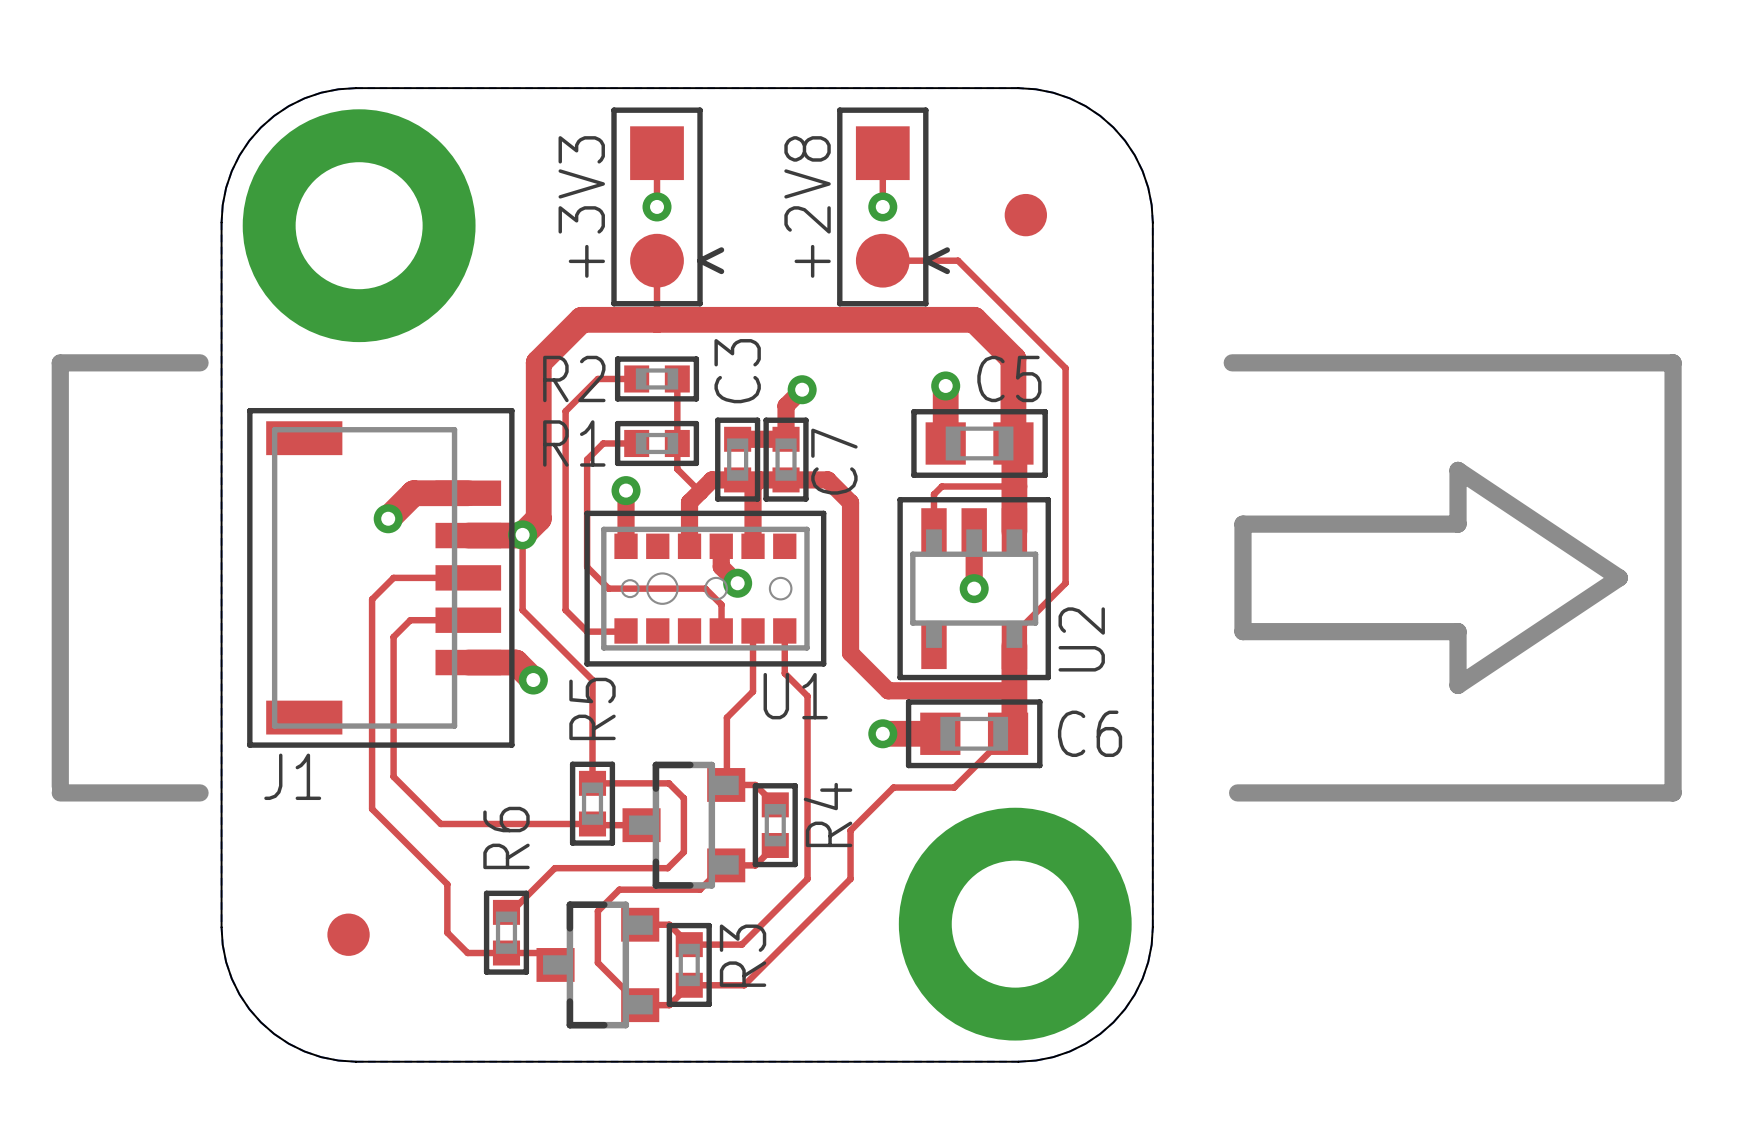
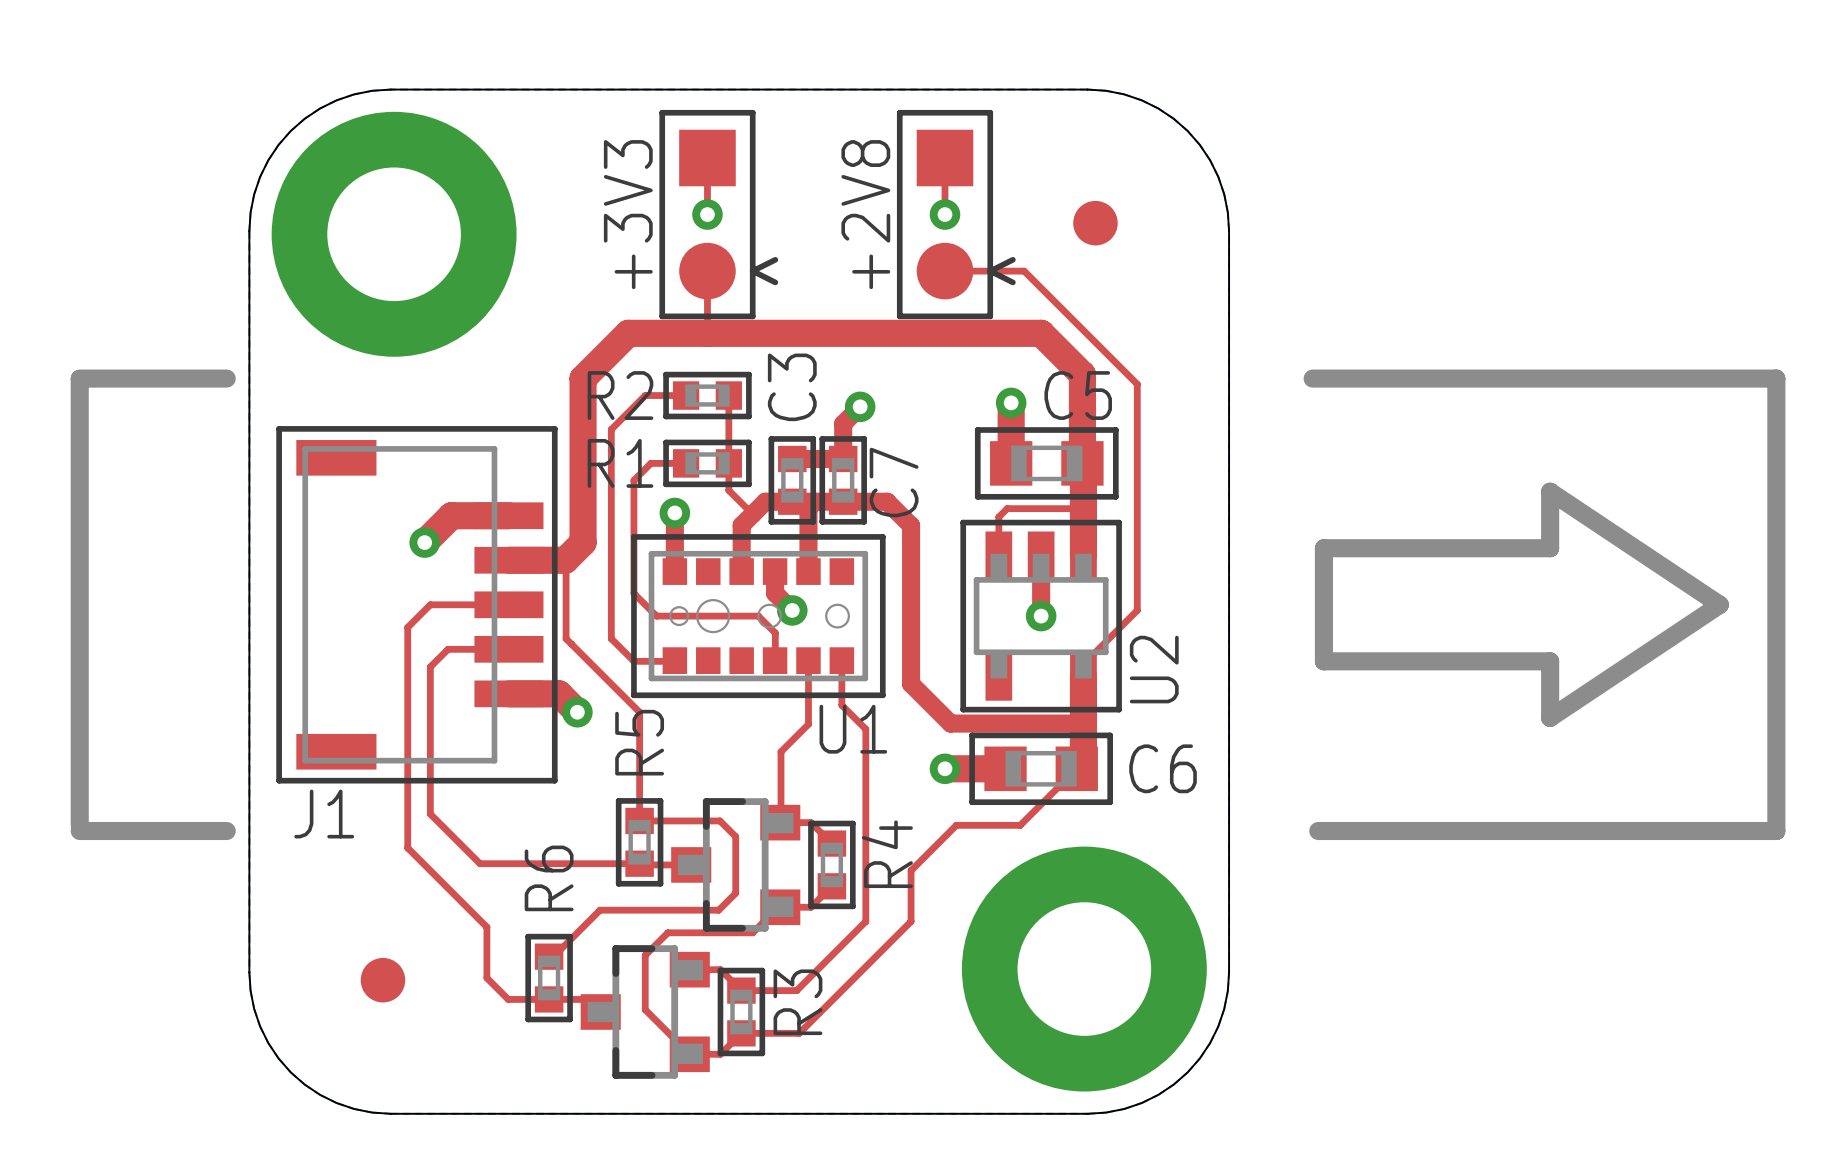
via: (522, 534) -> none

